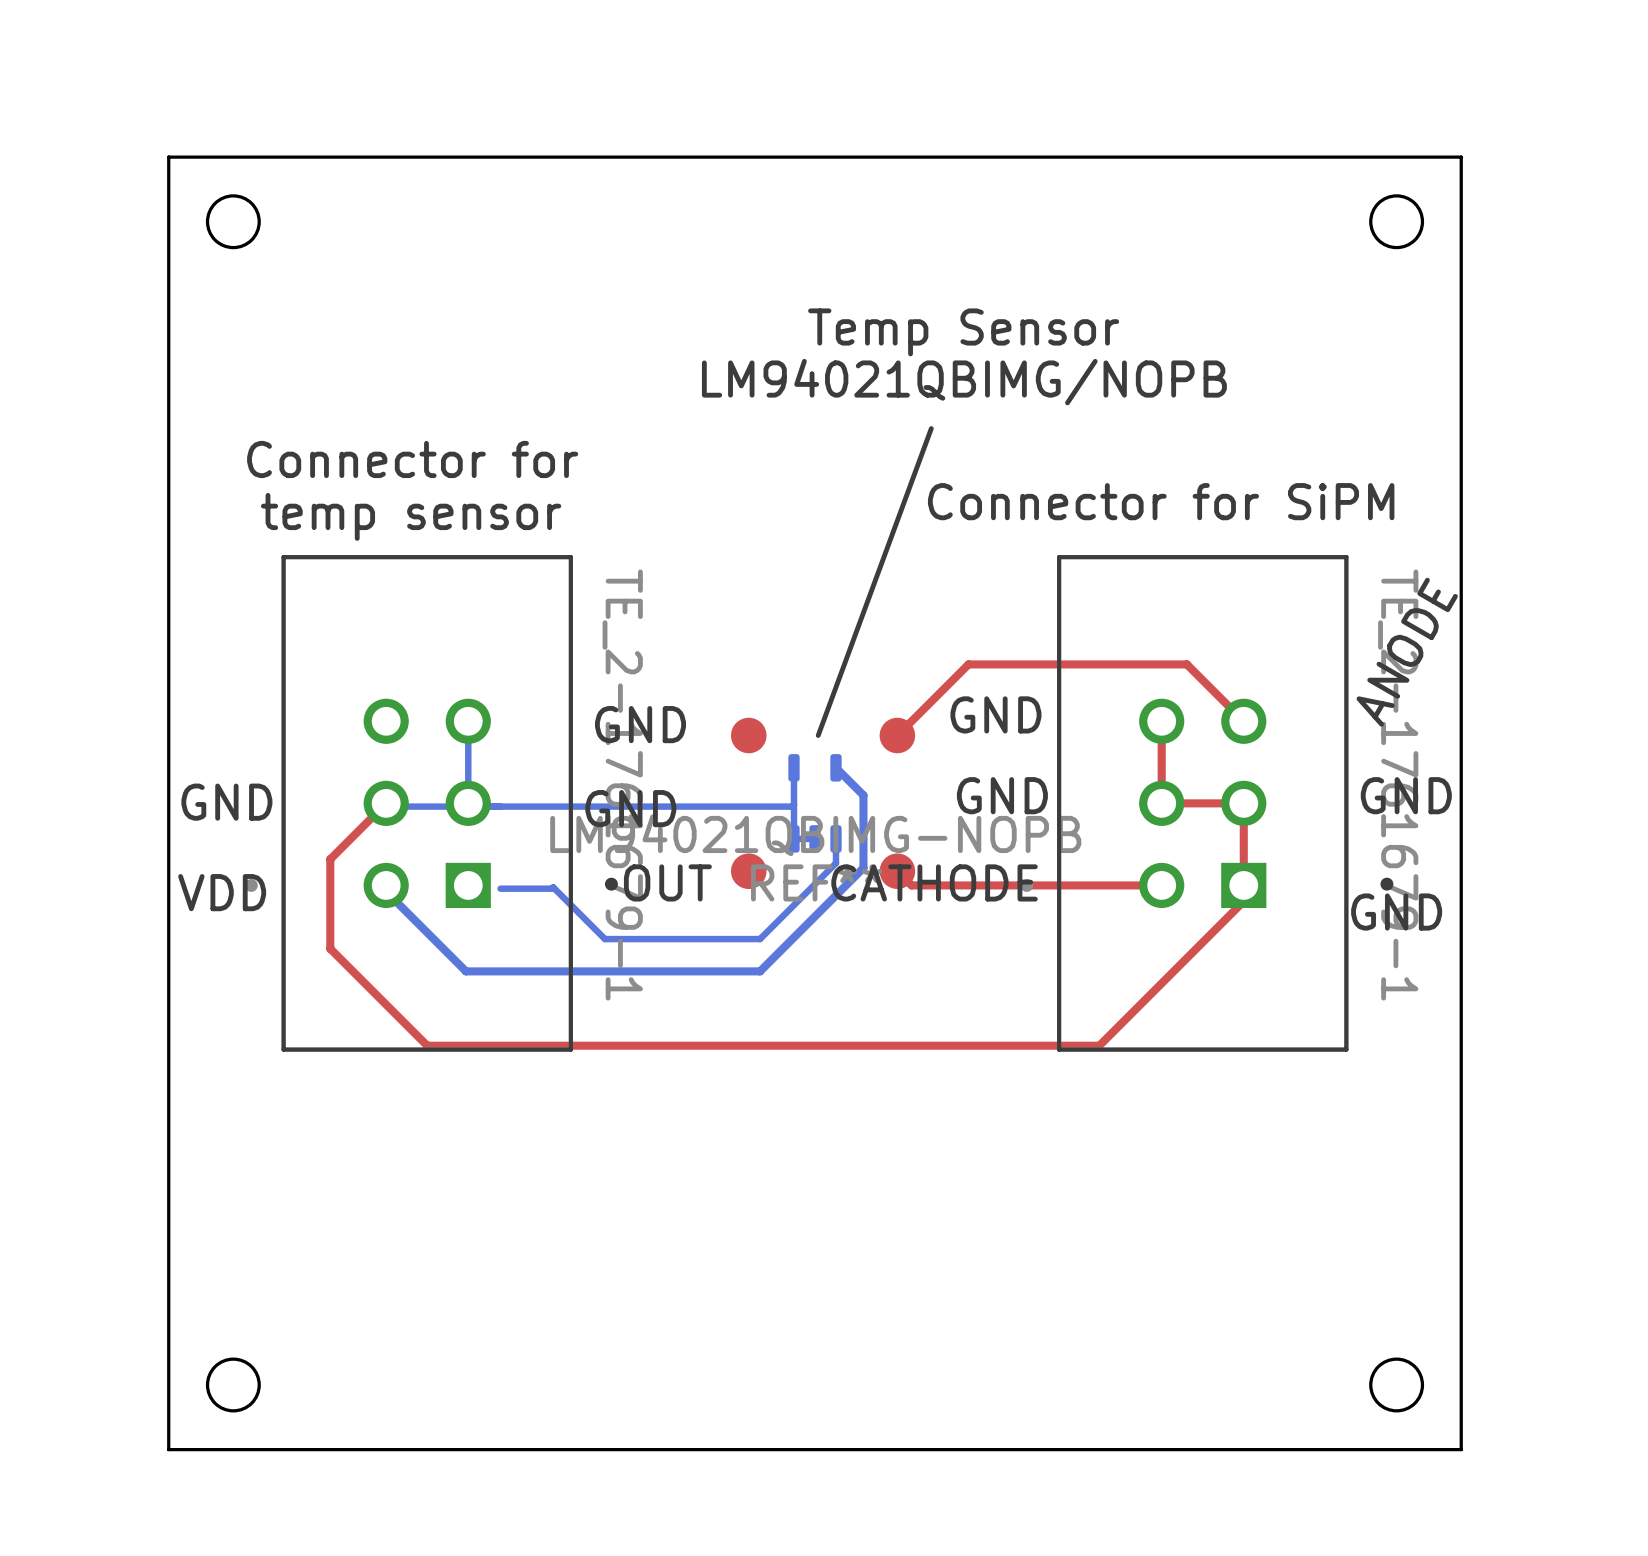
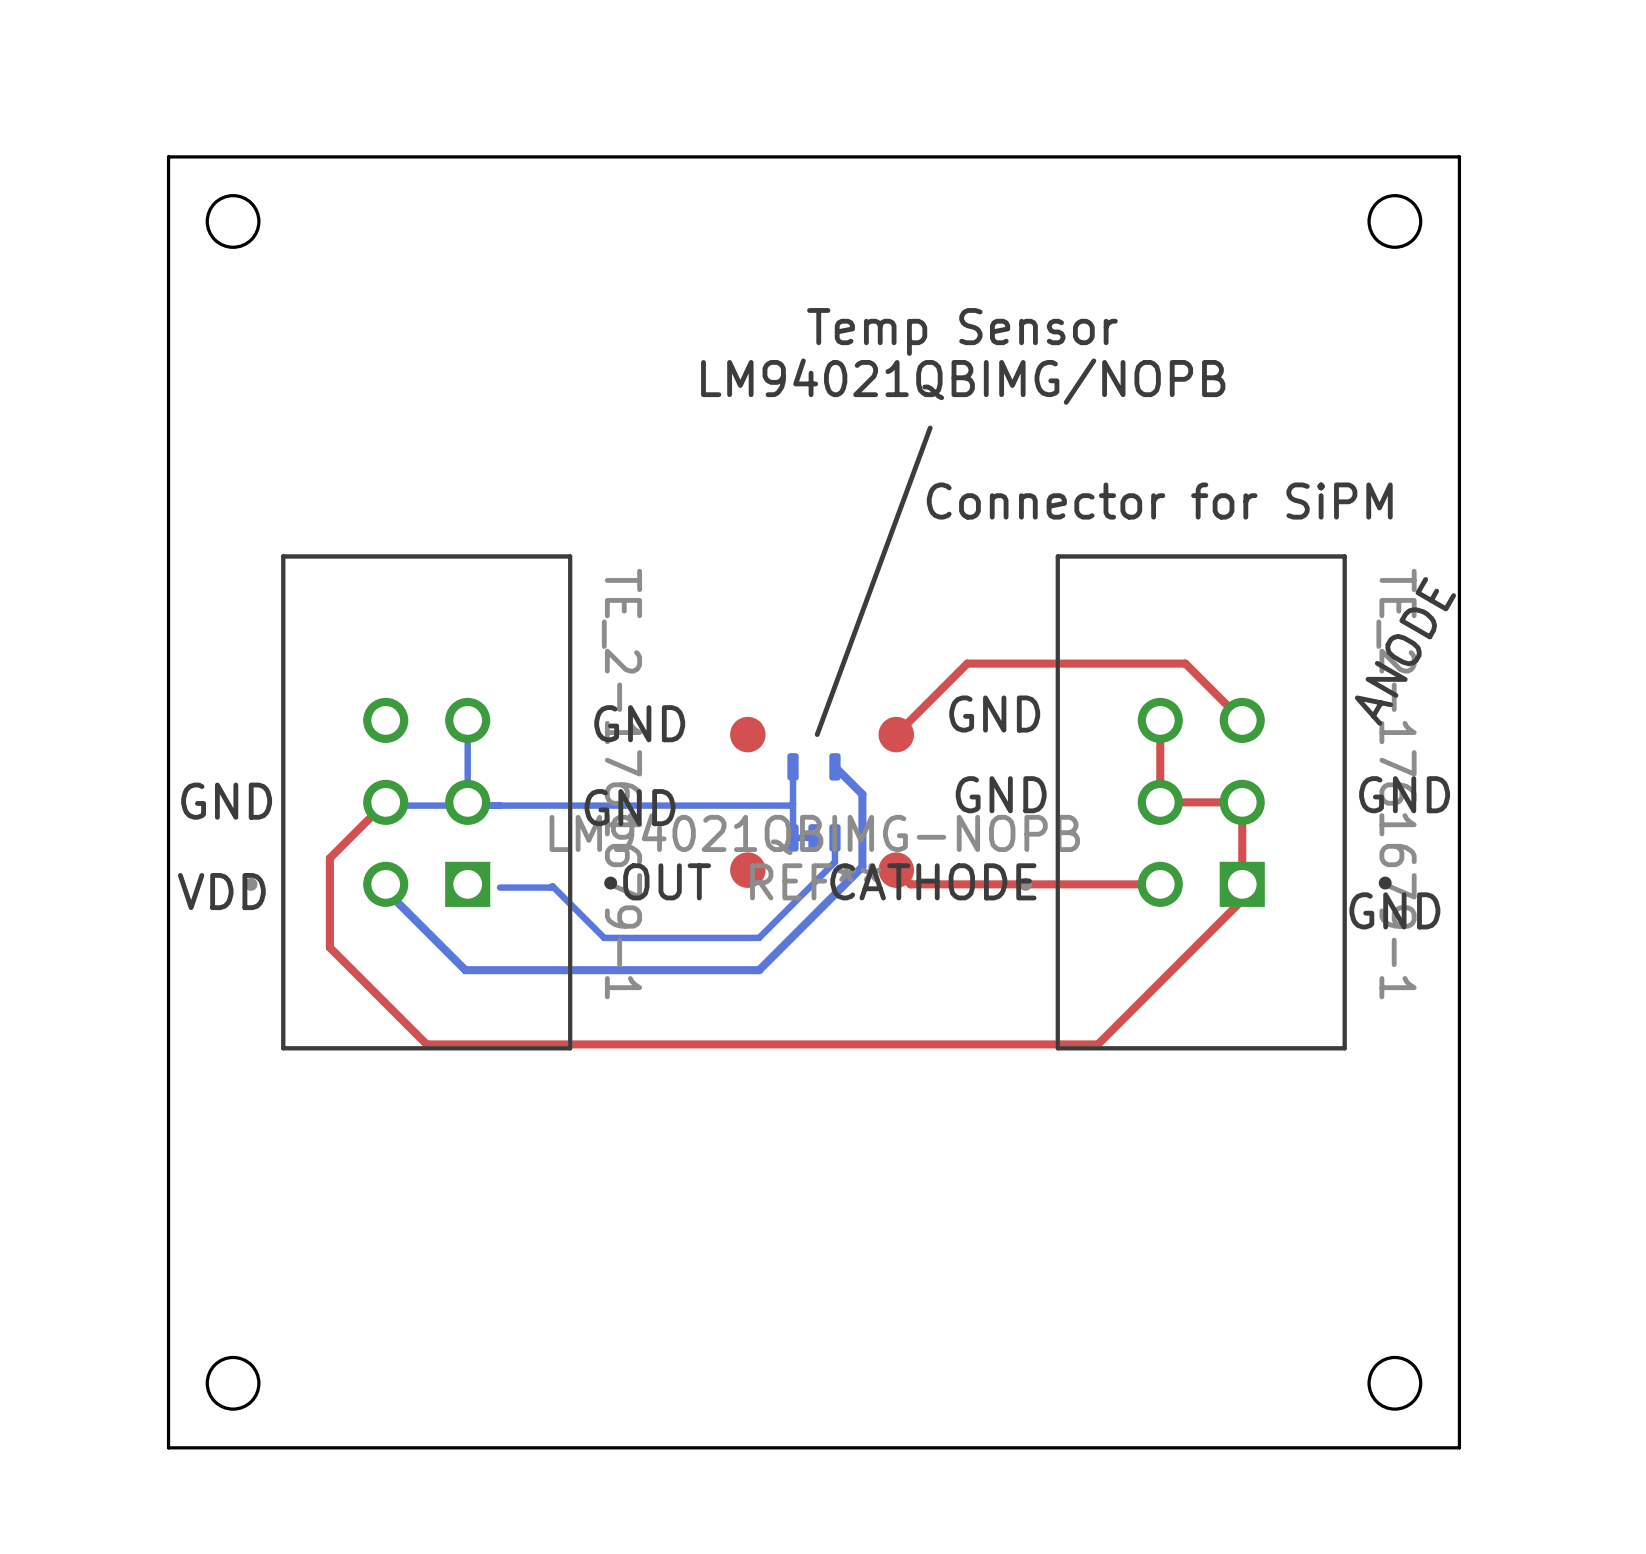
text: Connector for (412, 459) -> none
text: temp sensor (411, 516) -> none

